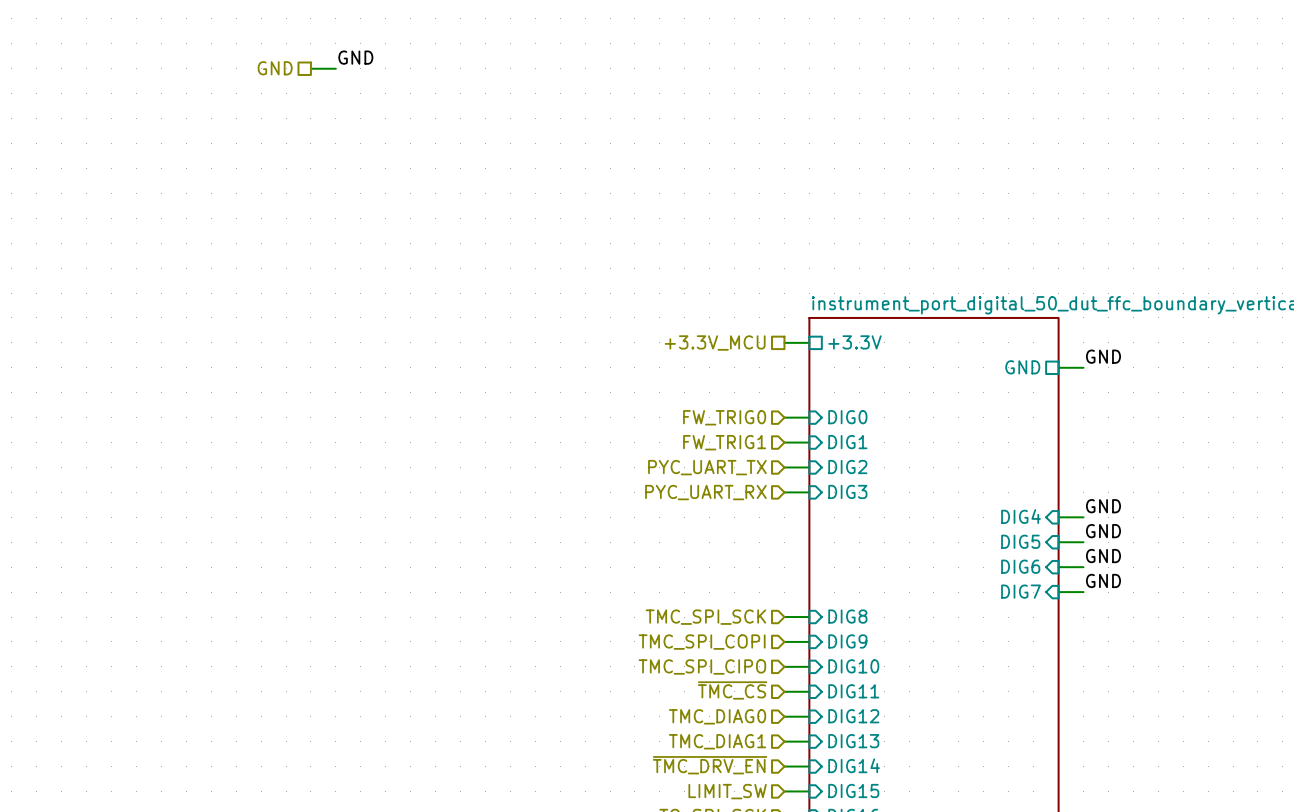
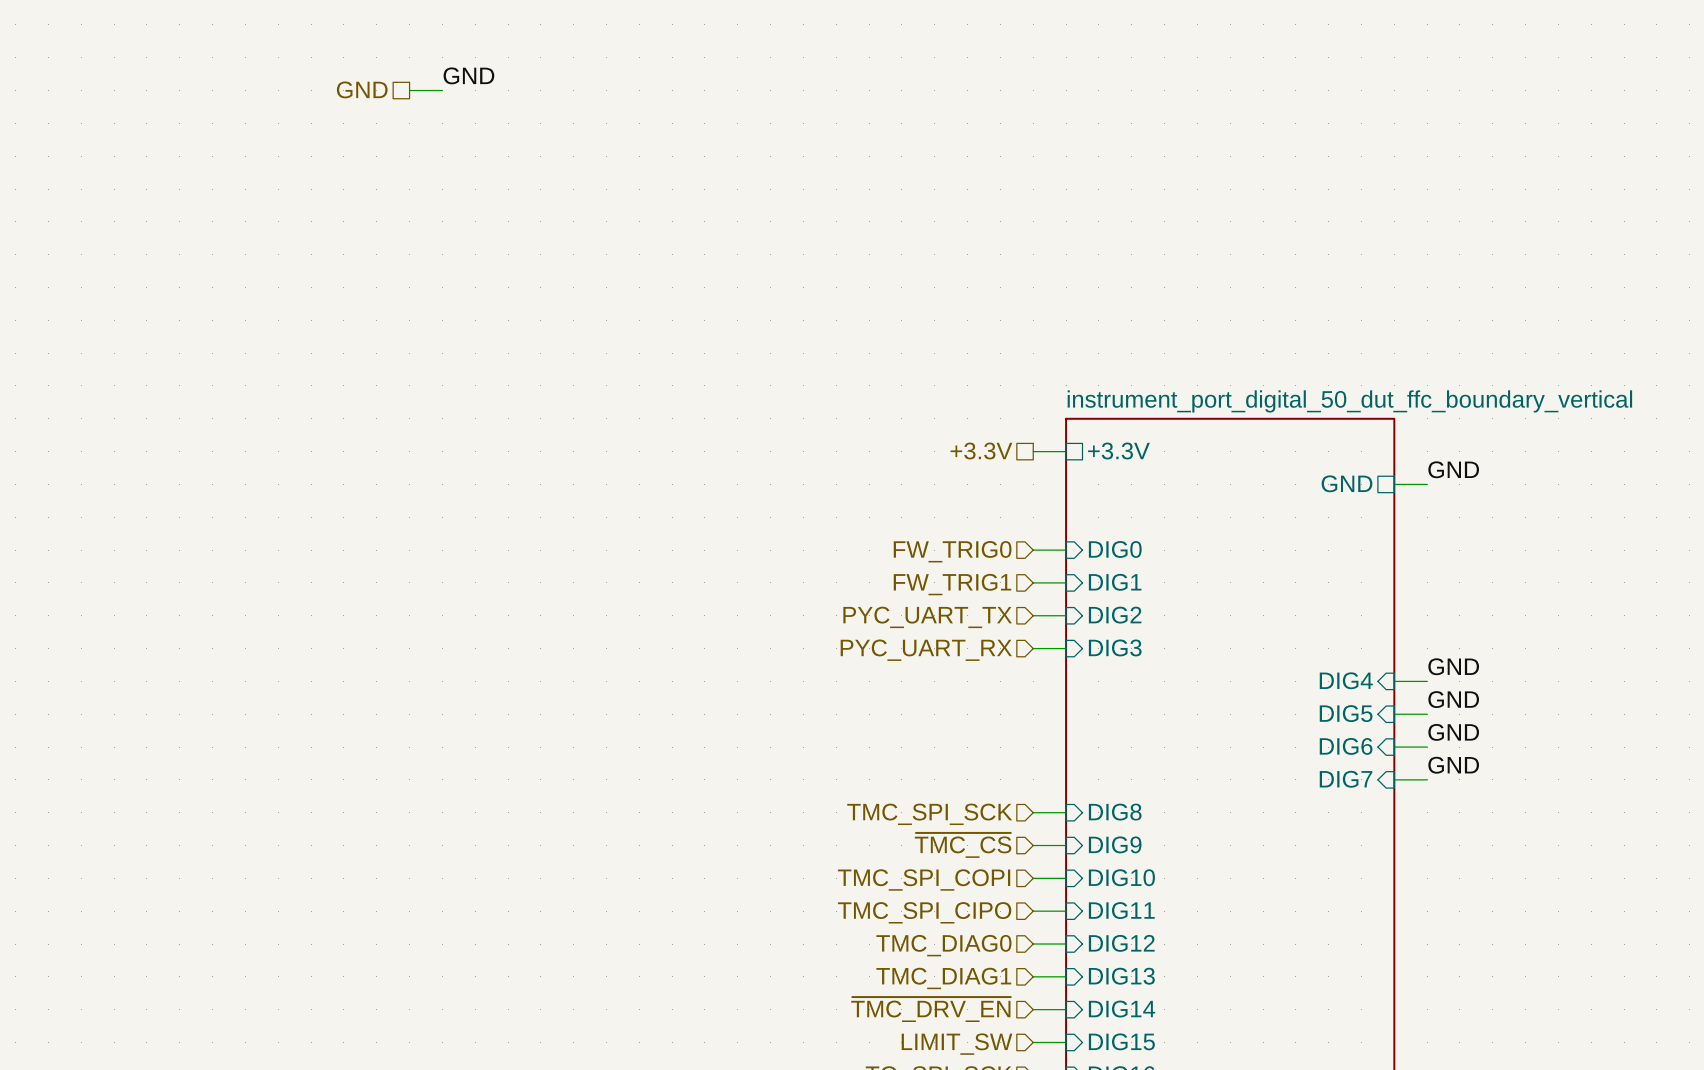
hierarchical label: +3.3V_MCU (715, 343) -> +3.3V (981, 451)
hierarchical label: TMC_SPI_COPI (702, 642) -> ~{TMC_CS} (963, 845)
hierarchical label: TMC_SPI_CIPO (702, 666) -> TMC_SPI_COPI (924, 879)
hierarchical label: ~{TMC_CS} (732, 690) -> TMC_SPI_CIPO (924, 912)

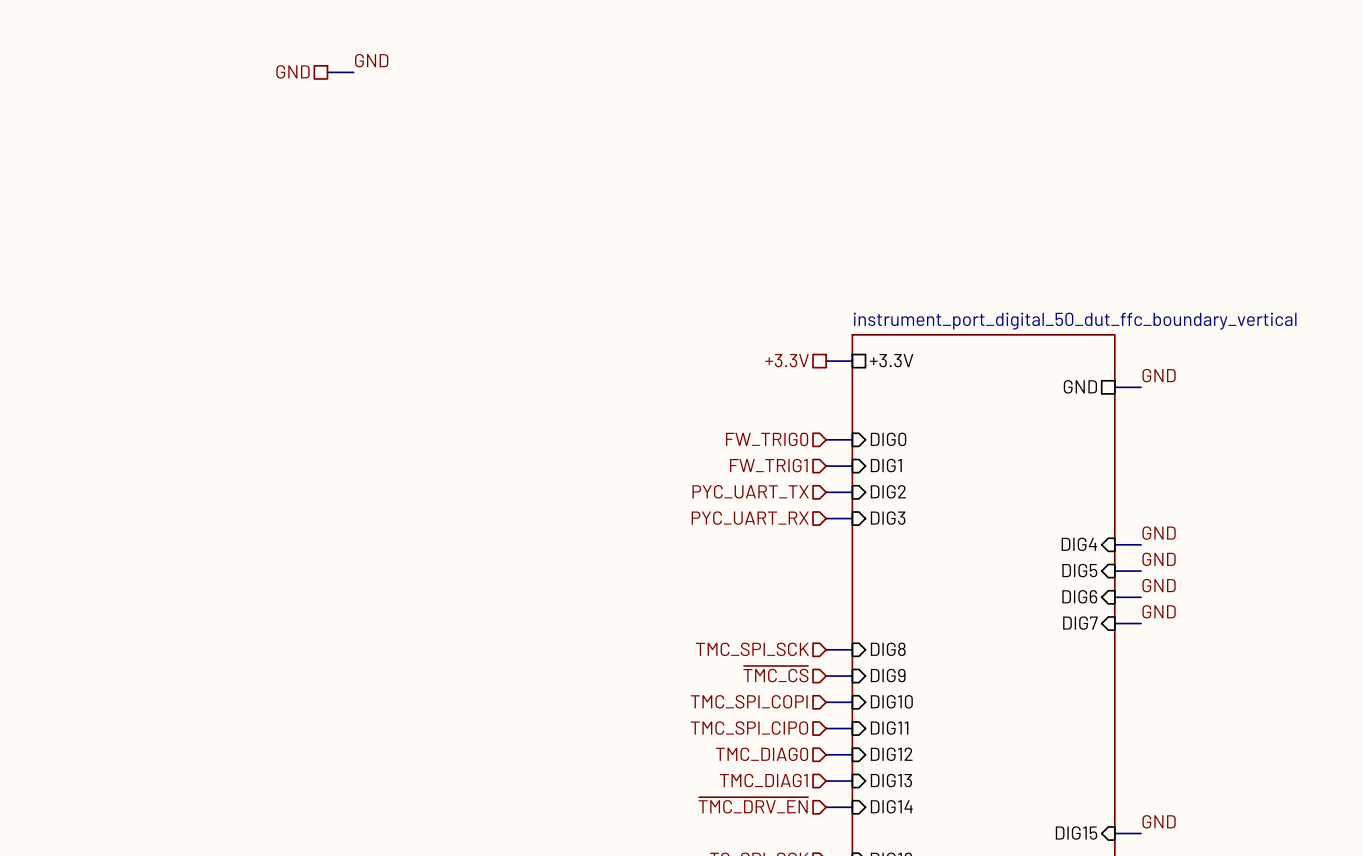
label: none -> GND (1159, 821)
sheet pin rotation: 0° (1121, 1041) -> 180° (1076, 833)
sheet pin position: DIG15 (1121, 1041) -> DIG15 (1076, 833)
wire: (1033, 1042) (1066, 1042) -> none
wire: none -> (1114, 833) (1141, 833)
hierarchical label: LIMIT_SW (957, 1044) -> none

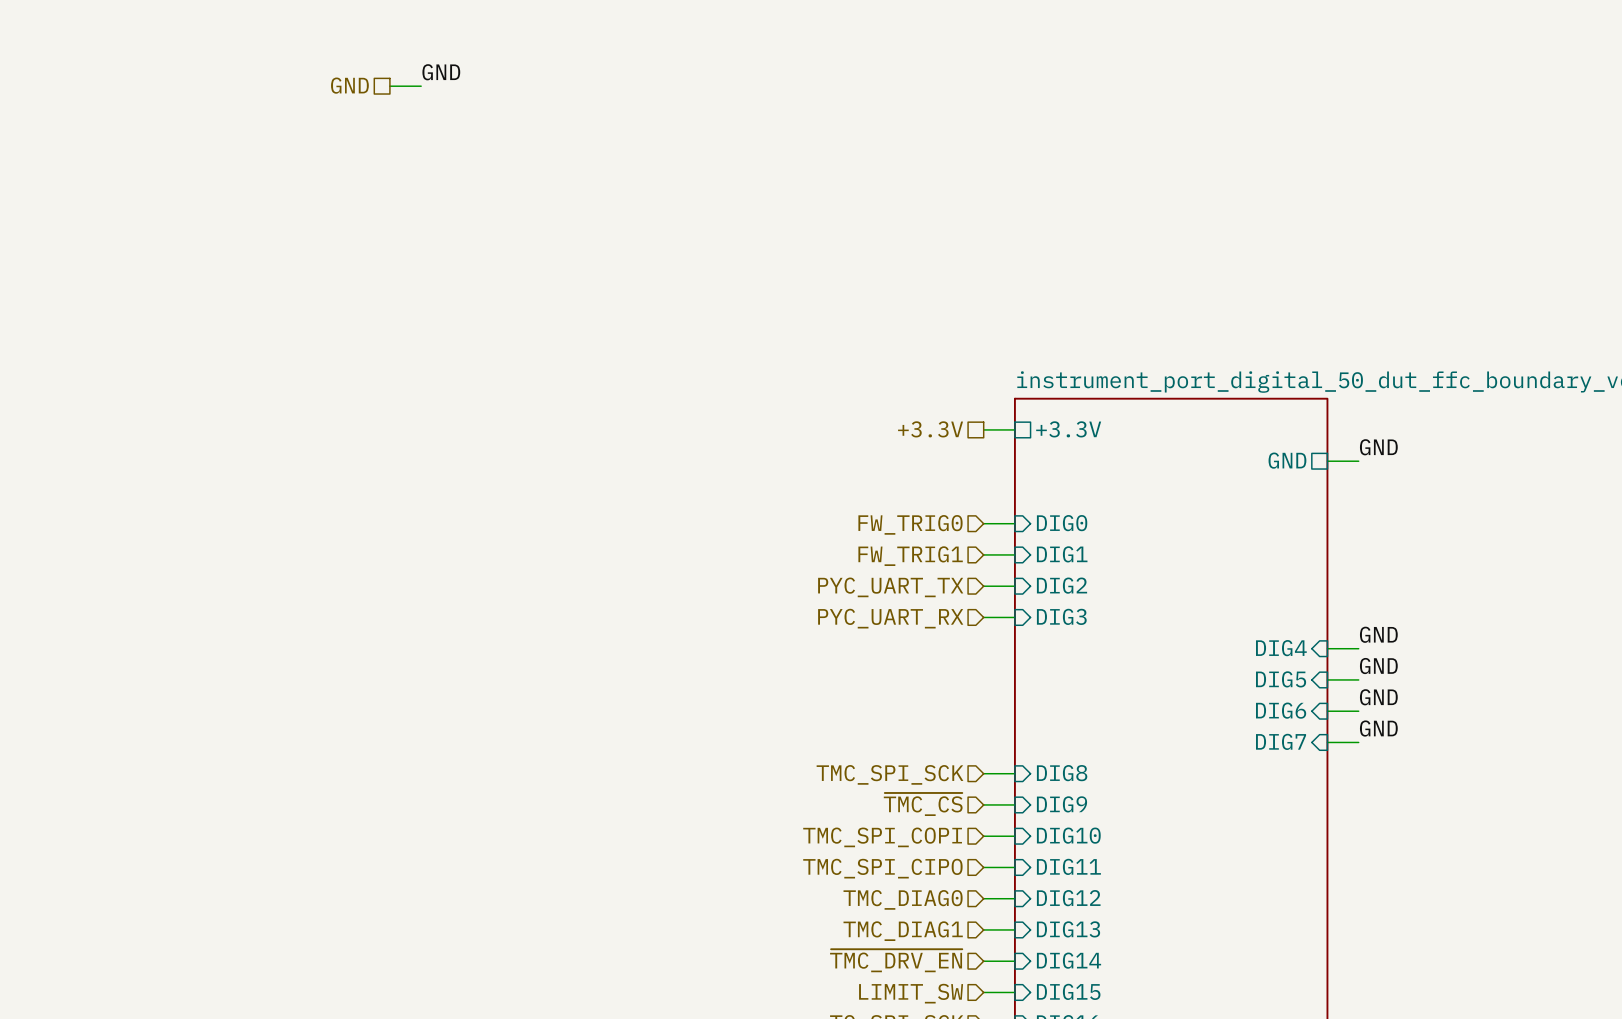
label: GND (1159, 821) -> none
hierarchical label: none -> LIMIT_SW (911, 993)
wire: none -> (983, 992) (1014, 992)
sheet pin rotation: 0° (1076, 833) -> 180° (1068, 991)
sheet pin position: DIG15 (1076, 833) -> DIG15 (1068, 991)
wire: (1114, 833) (1141, 833) -> none

